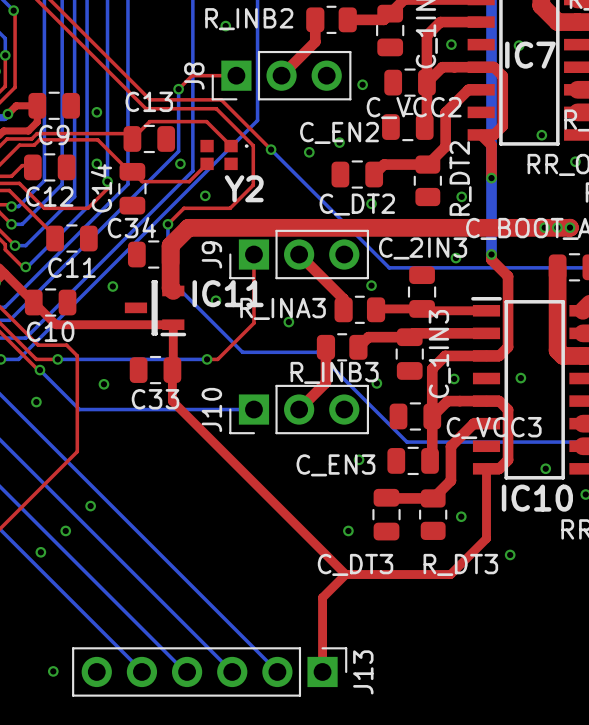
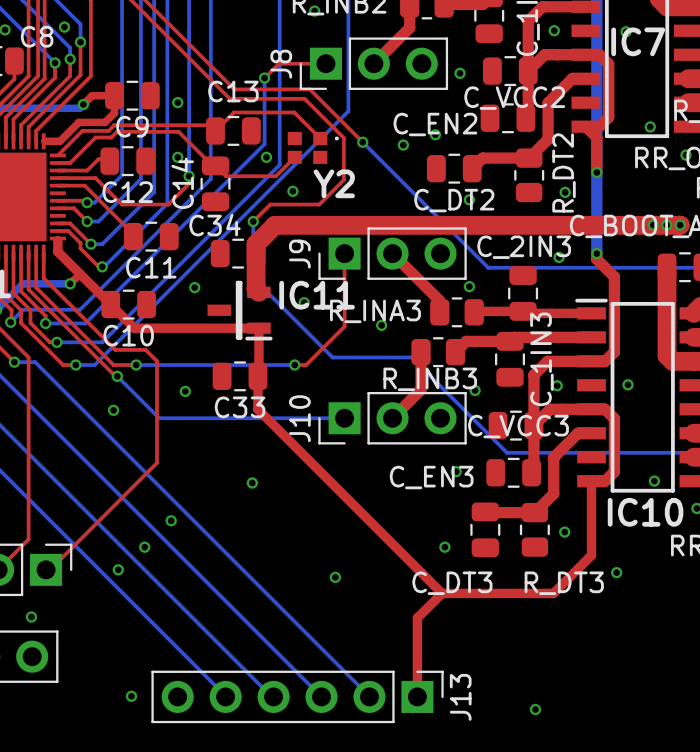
C_VCC3 name position: C_VCC3 (494, 428) -> C_VCC3 (518, 426)
via: none -> (252, 482)
via: none -> (335, 577)
via: none -> (535, 709)

